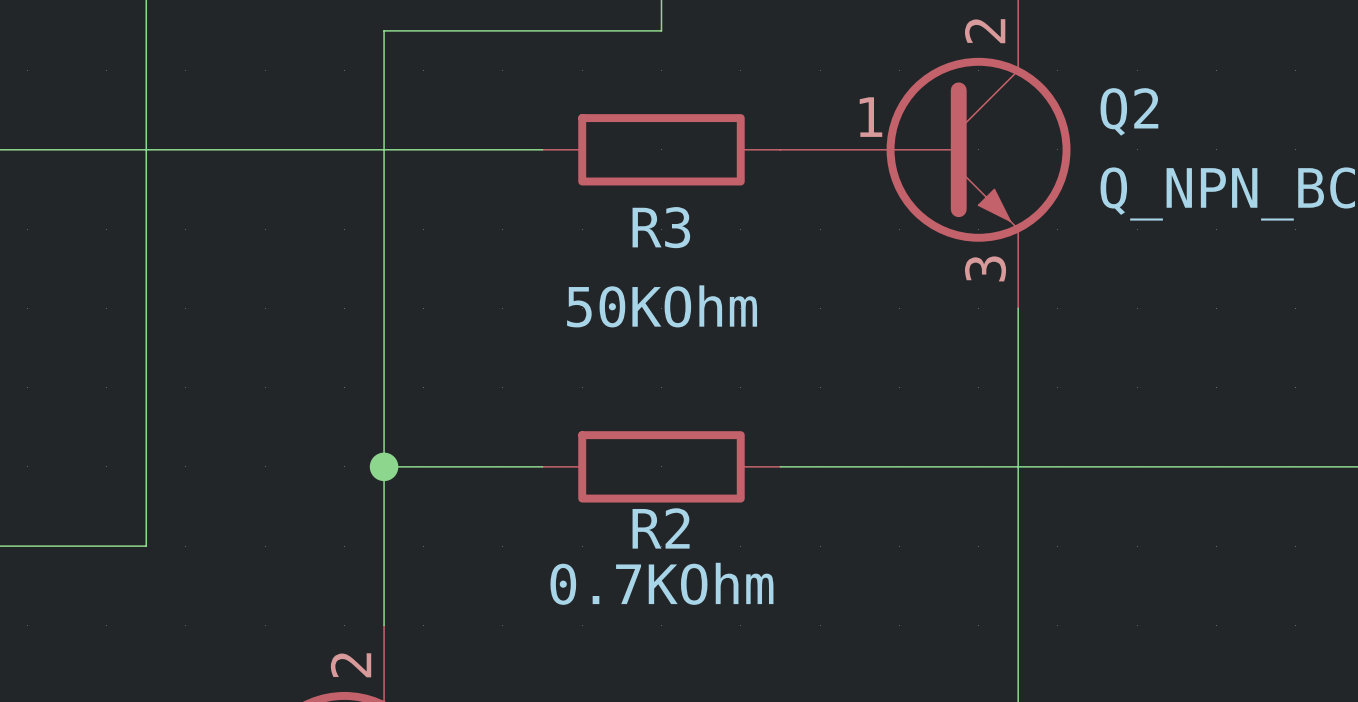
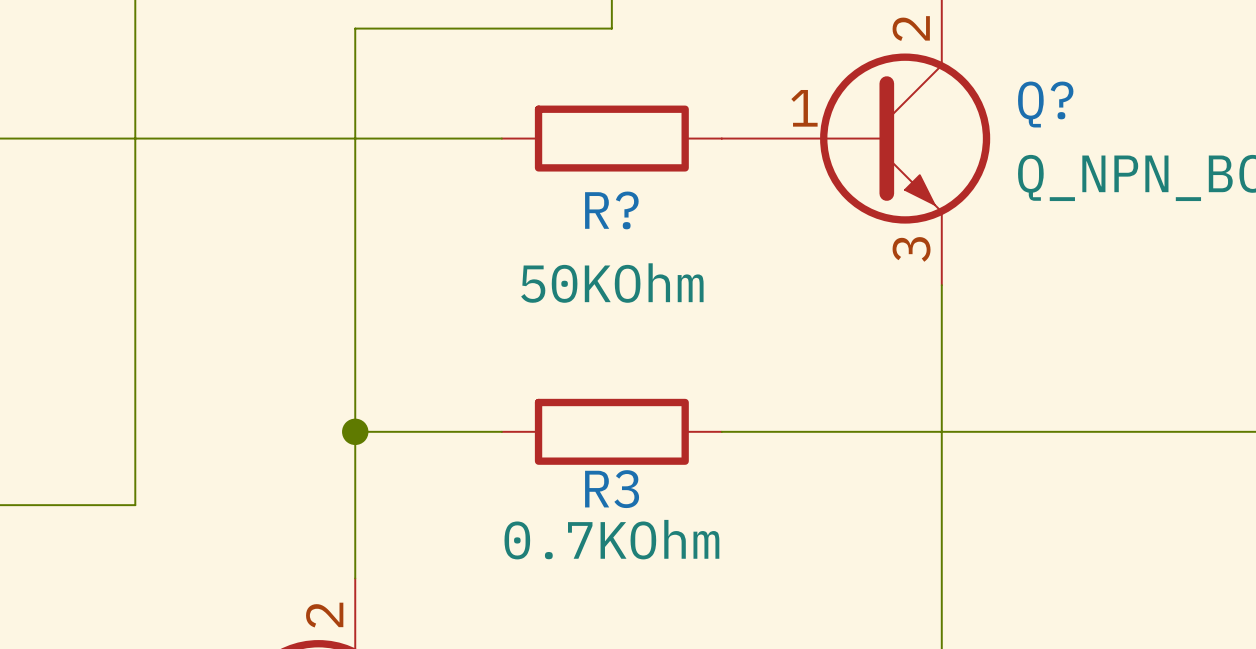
Q2 name: Q2 (1129, 111) -> Q? (1045, 104)
R3 name: R3 (661, 227) -> R? (611, 210)
R2 name: R2 (661, 528) -> R3 (612, 489)

